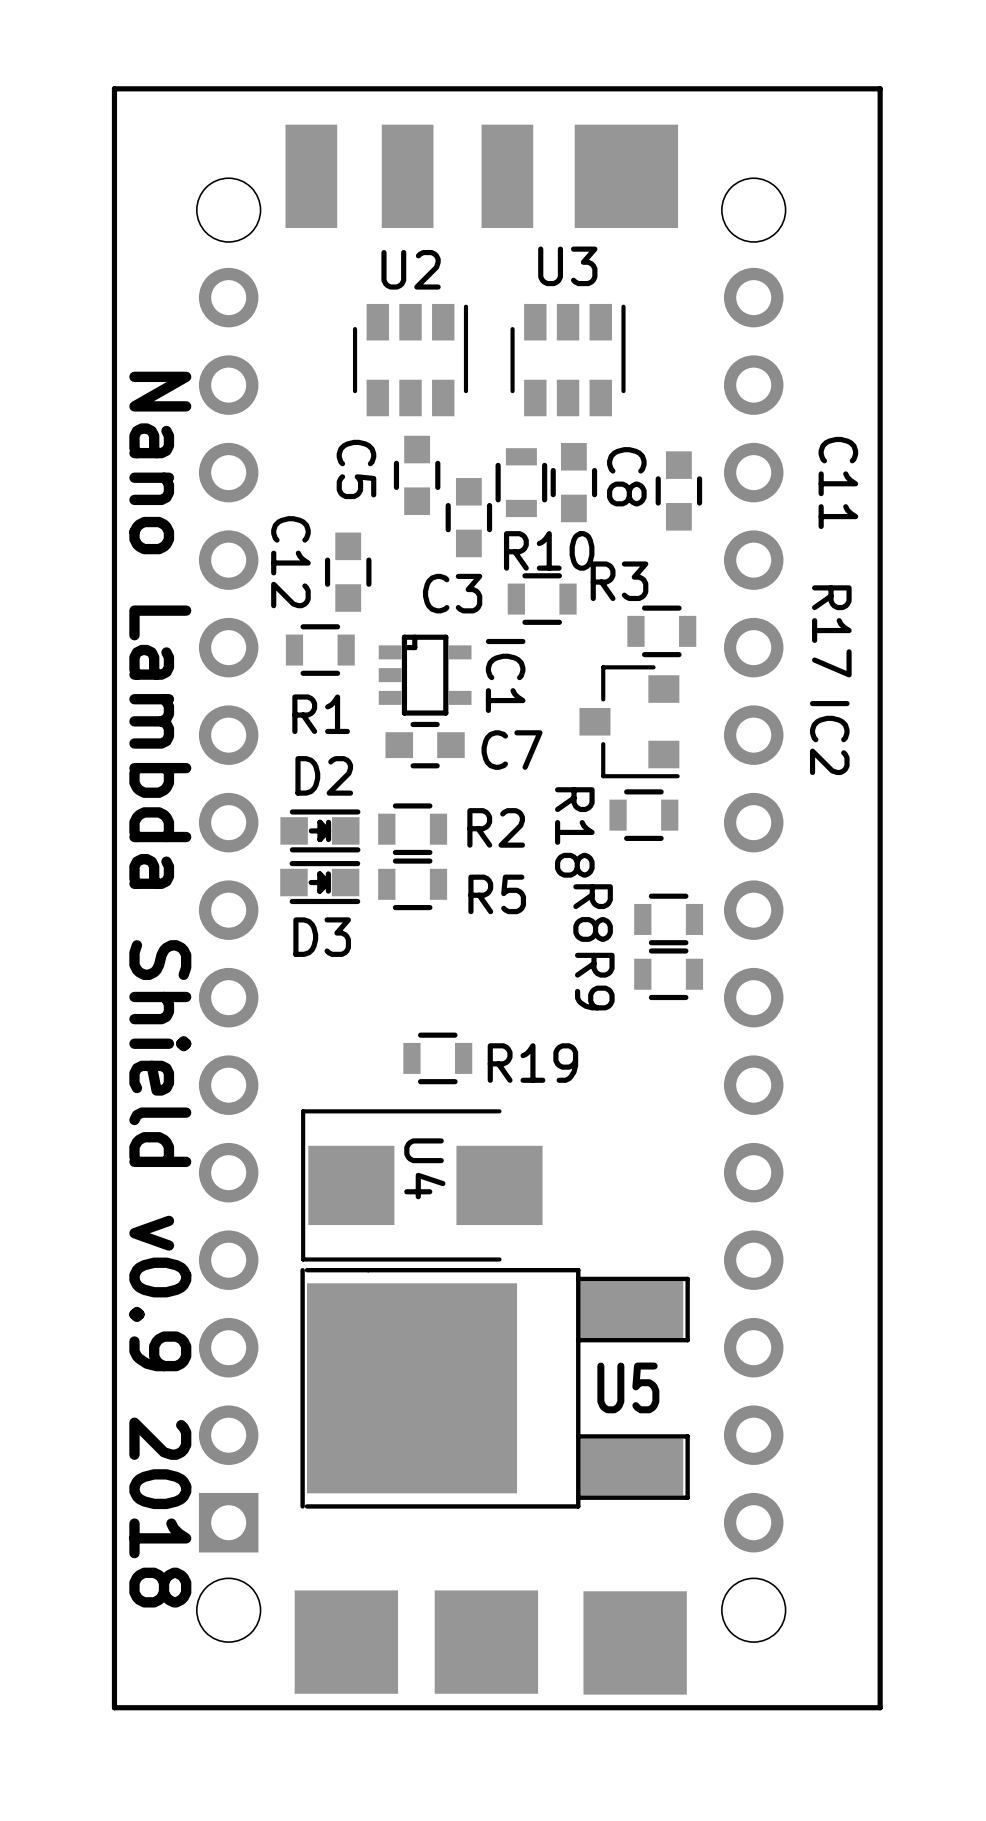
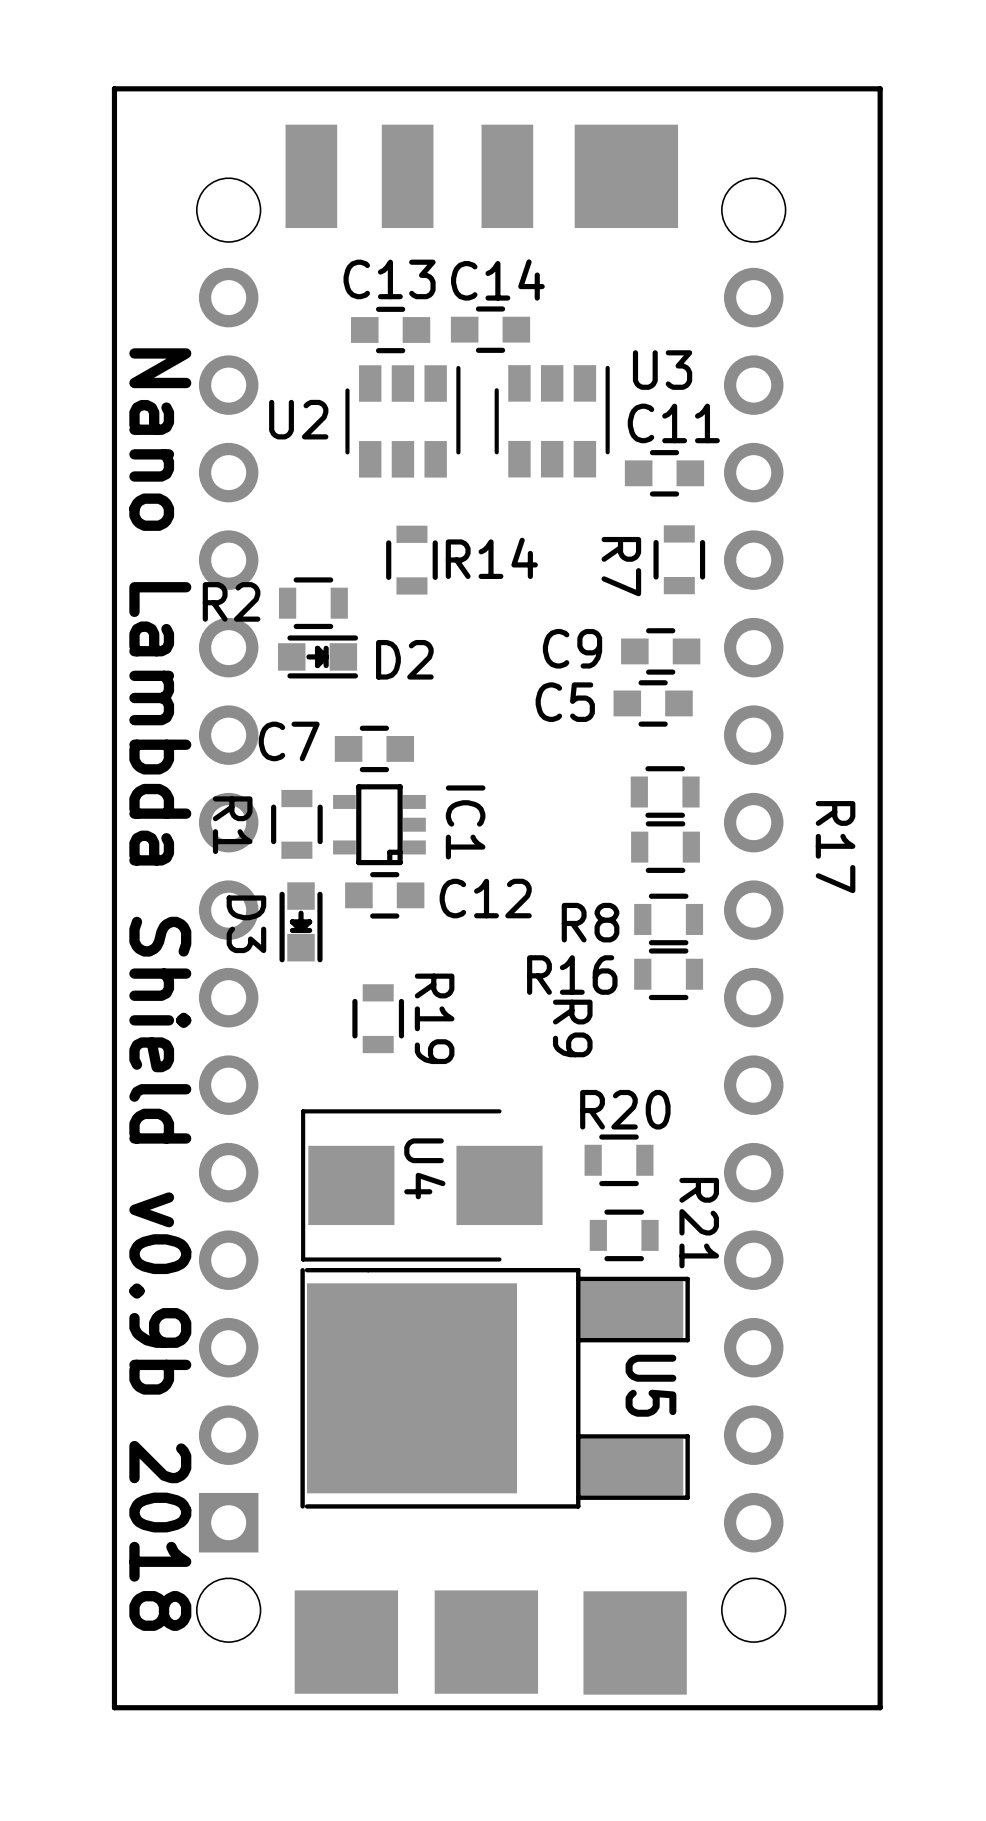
U3 name position: U3 (567, 266) -> U3 (662, 370)
U2 name position: U2 (411, 269) -> U2 (298, 419)
C13: none -> (390, 329)
C14: none -> (490, 329)
U2 position: (410, 360) -> (402, 421)
U3 position: (568, 360) -> (552, 421)
C5 rotation: 0° (417, 475) -> 90° clockwise (653, 703)
C5 position: (417, 475) -> (653, 703)
R10: (521, 482) -> none
C8: (573, 482) -> none
C11 name position: C11 (838, 482) -> C11 (673, 423)
C11 rotation: 0° (678, 490) -> 90° clockwise (664, 473)
C3: (468, 517) -> none
R7: none -> (679, 559)
R14: none -> (411, 560)
C12 name position: C12 (290, 562) -> C12 (485, 898)
C12 rotation: 0° (348, 572) -> 90° clockwise (384, 895)
C12 position: (348, 572) -> (384, 895)
R3: (542, 599) -> none
R17 position: (661, 631) -> (665, 847)
R1 rotation: 0° (320, 650) -> 90° clockwise (296, 824)
R1 position: (320, 650) -> (296, 824)
C9: none -> (660, 651)
IC1 rotation: 0° (425, 675) -> 180° (379, 824)
IC1 position: (425, 675) -> (379, 824)
IC2: (629, 721) -> none
C7 position: (425, 745) -> (374, 748)
C7 name position: C7 (512, 750) -> C7 (289, 741)
D2 name position: D2 (324, 775) -> D2 (404, 659)
R18 position: (643, 815) -> (665, 791)
R2 name position: R2 (496, 827) -> R2 (231, 601)
R2 position: (412, 829) -> (313, 603)
D2 position: (320, 830) -> (318, 656)
R18 name: R18 (574, 832) -> R16 (572, 975)
D3 rotation: 0° (320, 882) -> 90° clockwise (301, 922)
R5: (412, 884) -> none
R8 name rotation: 0° (593, 913) -> 90° counterclockwise (590, 922)
R9 name position: R9 (594, 981) -> R9 (572, 1028)
text: Nano Lambda Shield v0.9 2018 (160, 989) -> Nano Lambda Shield v0.9b 2018 (160, 989)
R19 rotation: 0° (437, 1058) -> 90° clockwise (378, 1018)
R19 position: (437, 1058) -> (378, 1018)
R20: none -> (619, 1160)
R21: none -> (624, 1235)
U5 name rotation: 0° (628, 1387) -> 90° clockwise (650, 1385)

